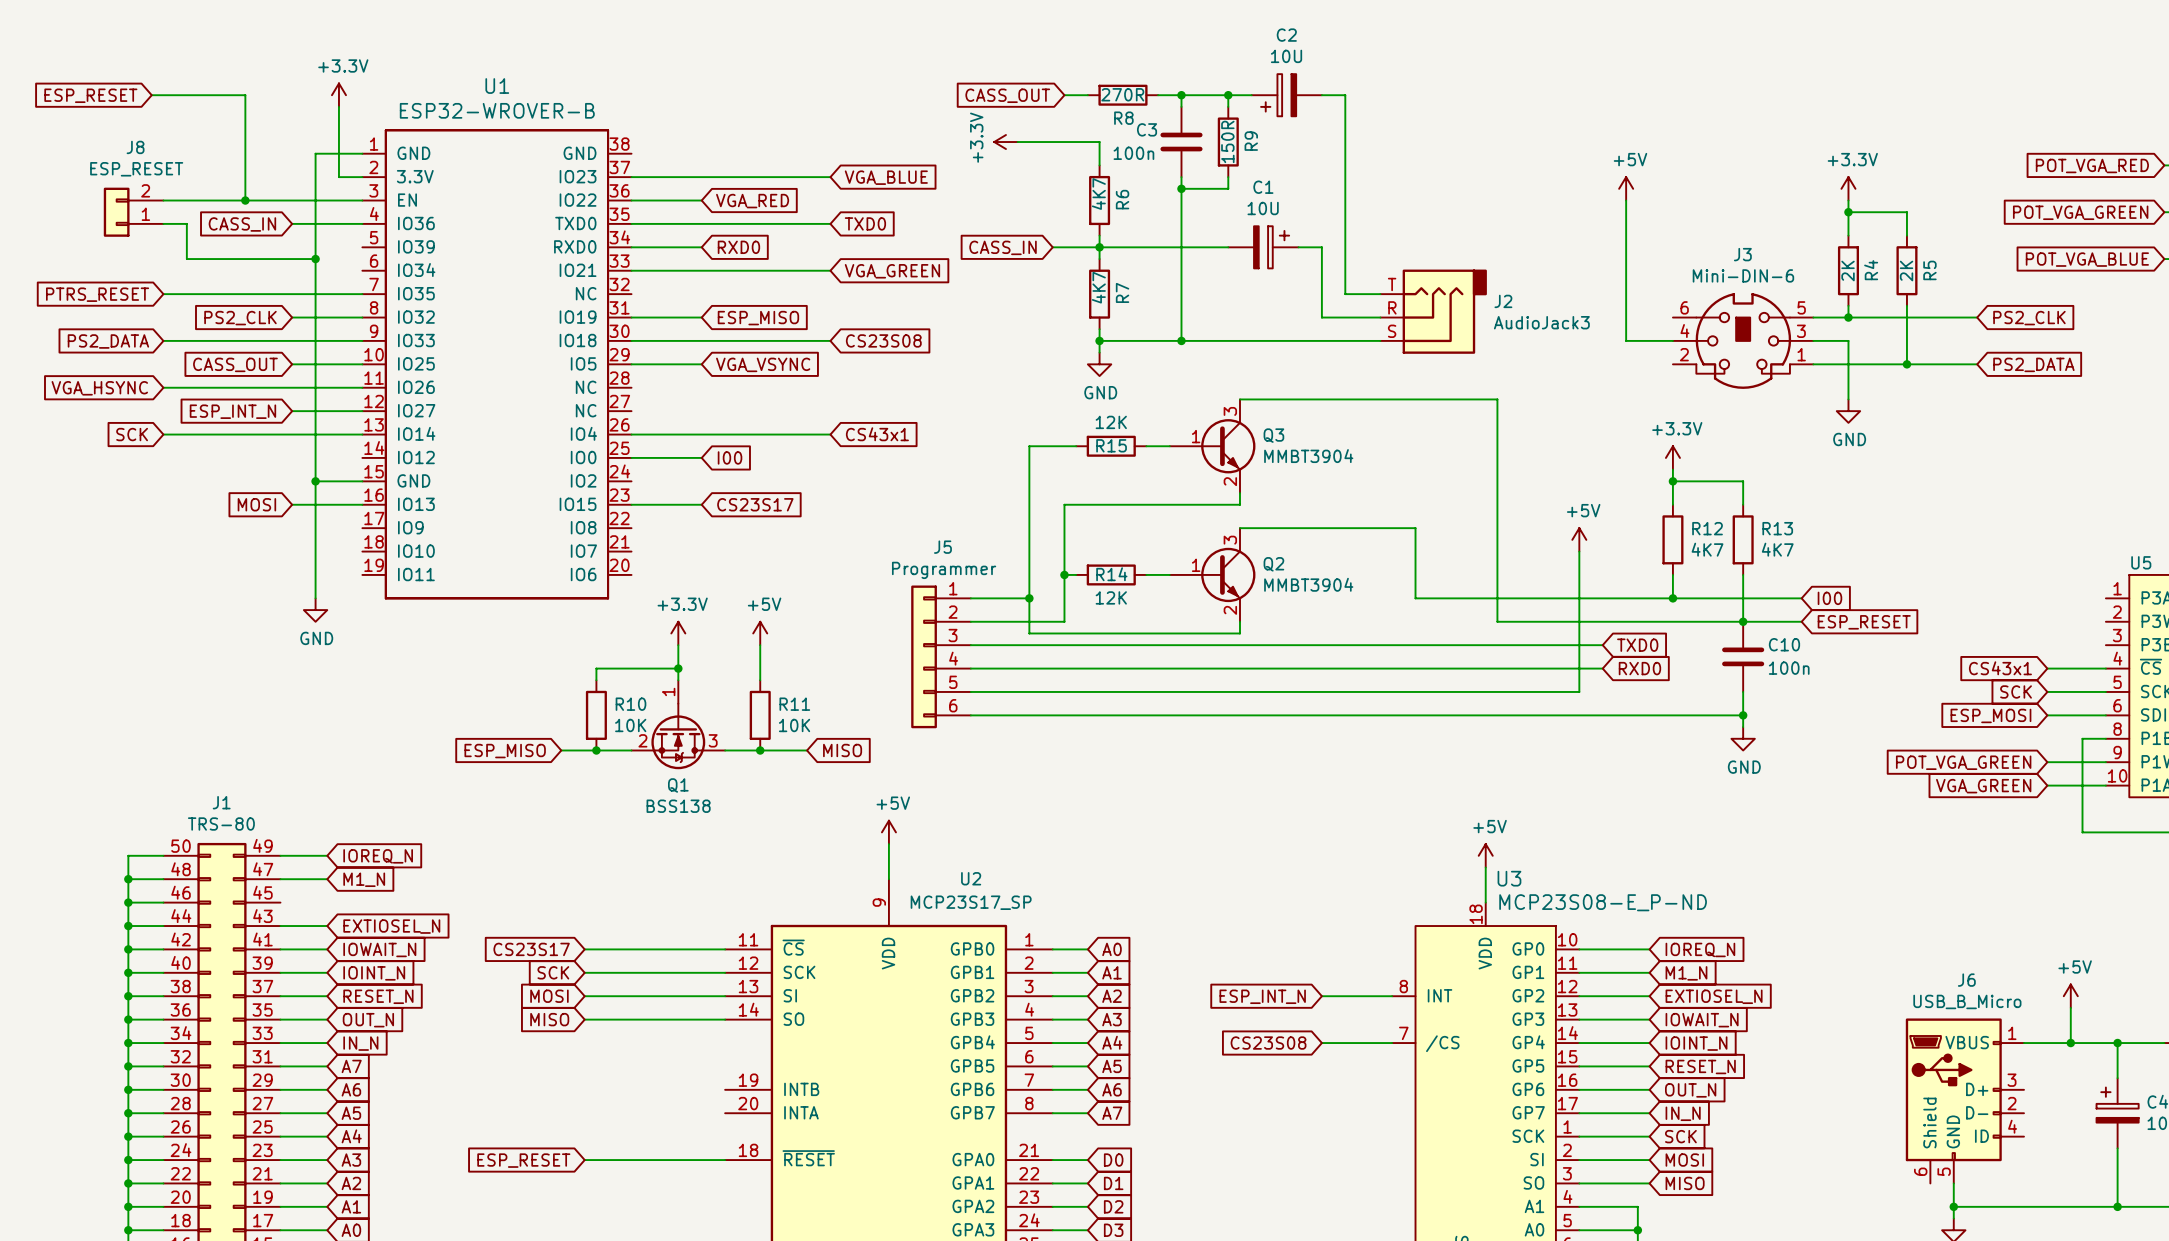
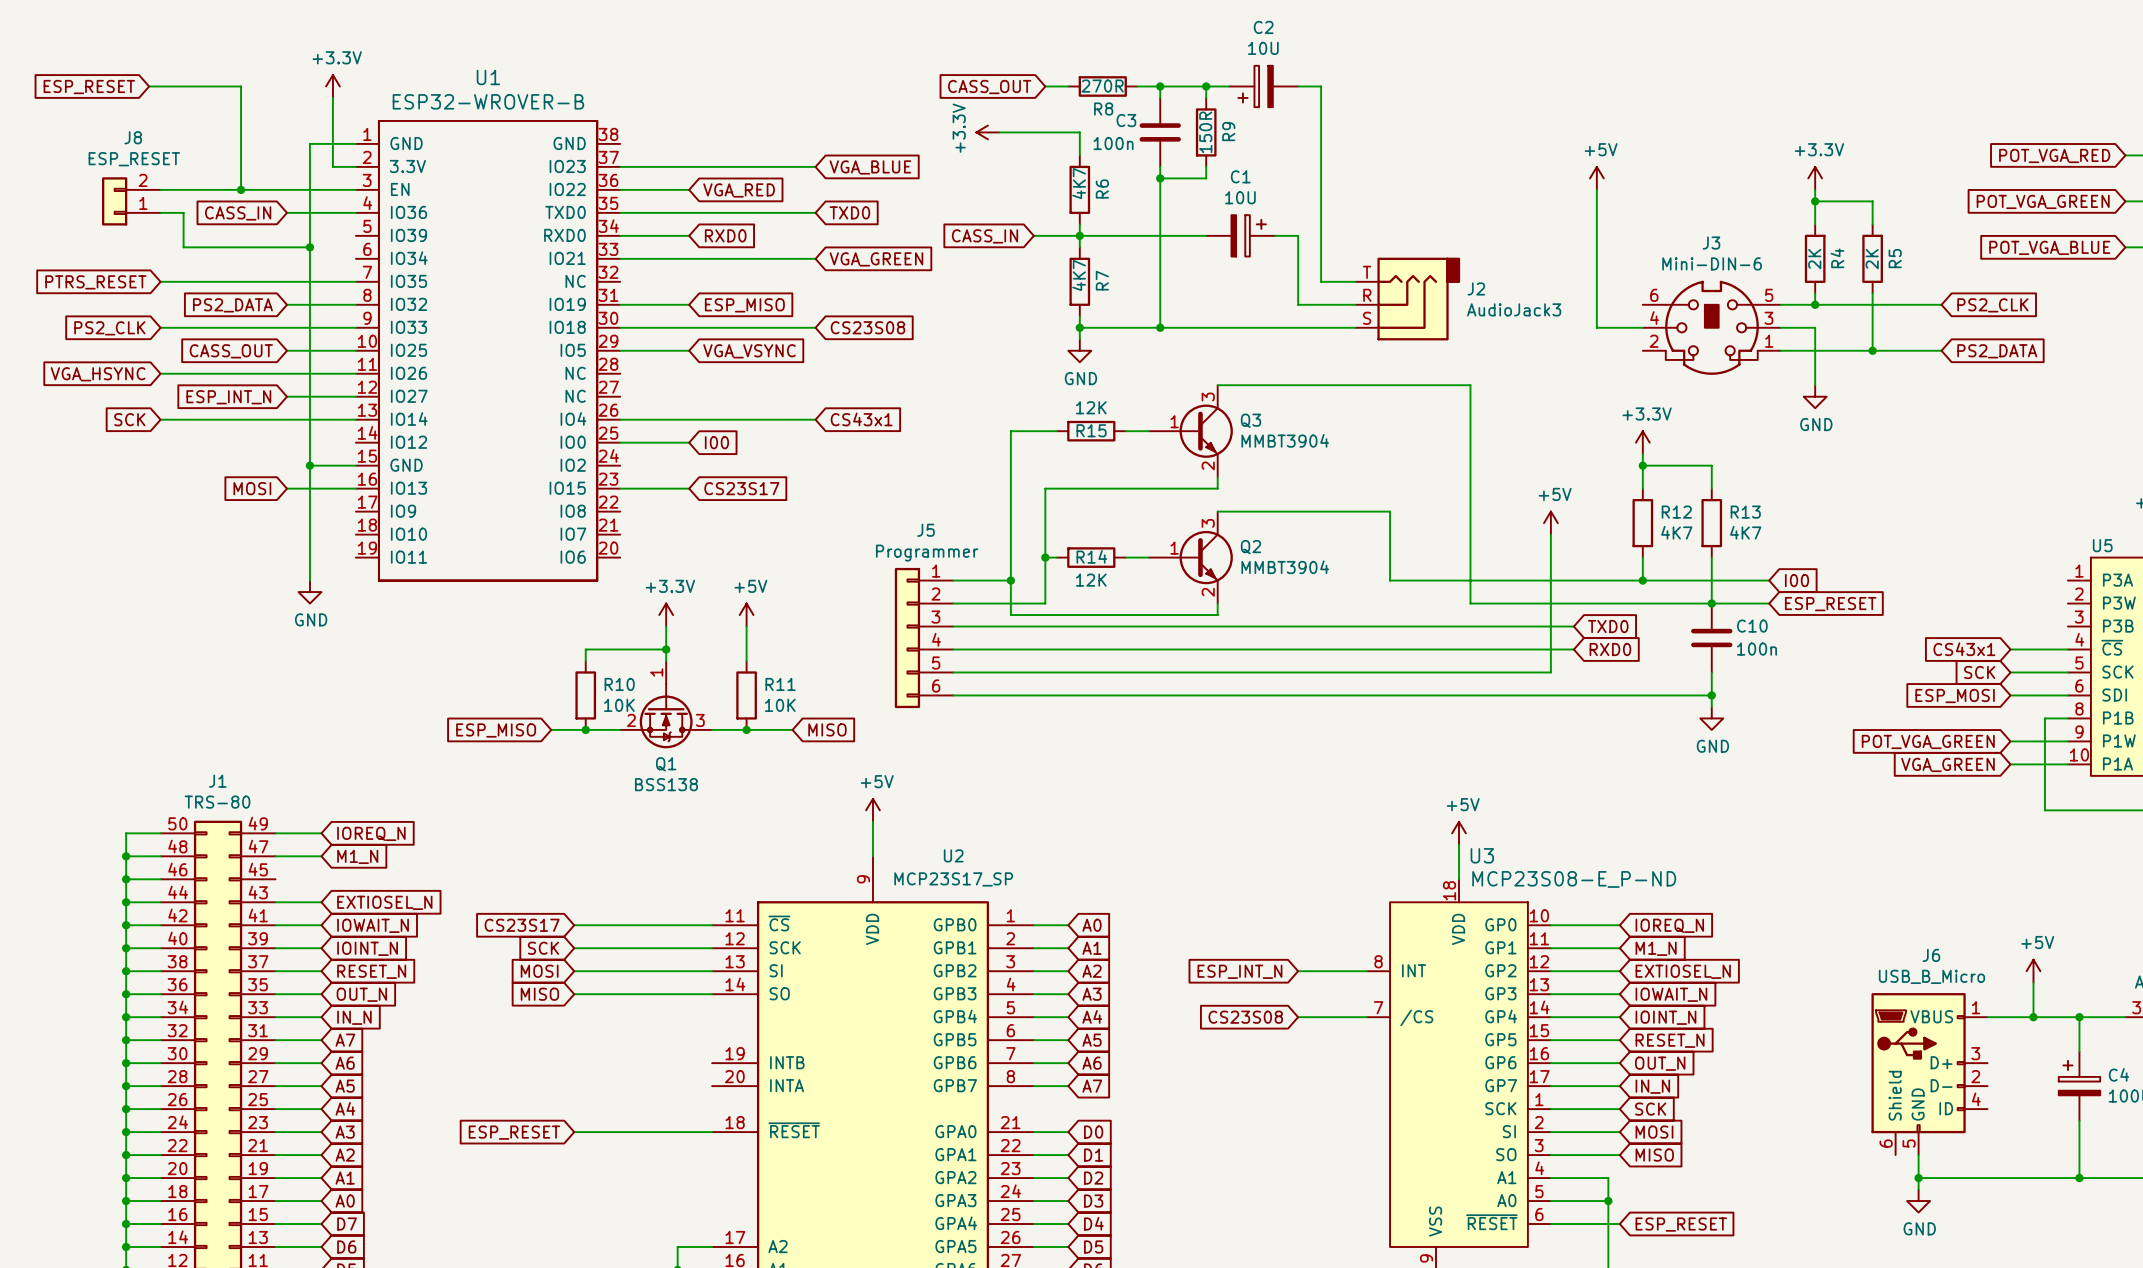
global label: PS2_CLK (240, 318) -> PS2_DATA (232, 305)
global label: PS2_DATA (108, 341) -> PS2_CLK (109, 328)

